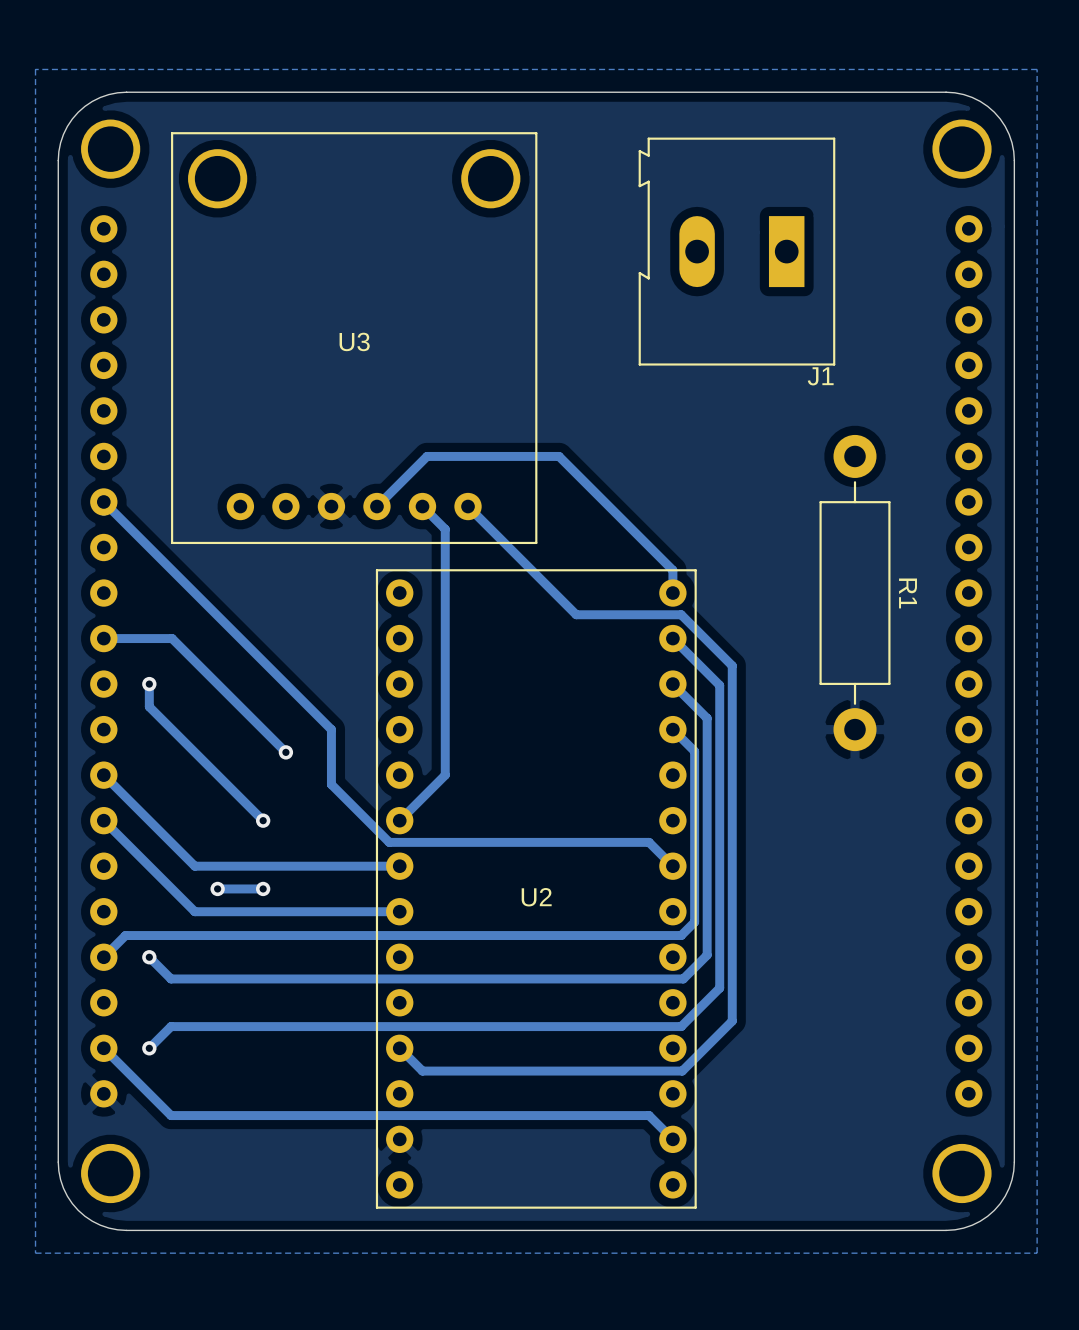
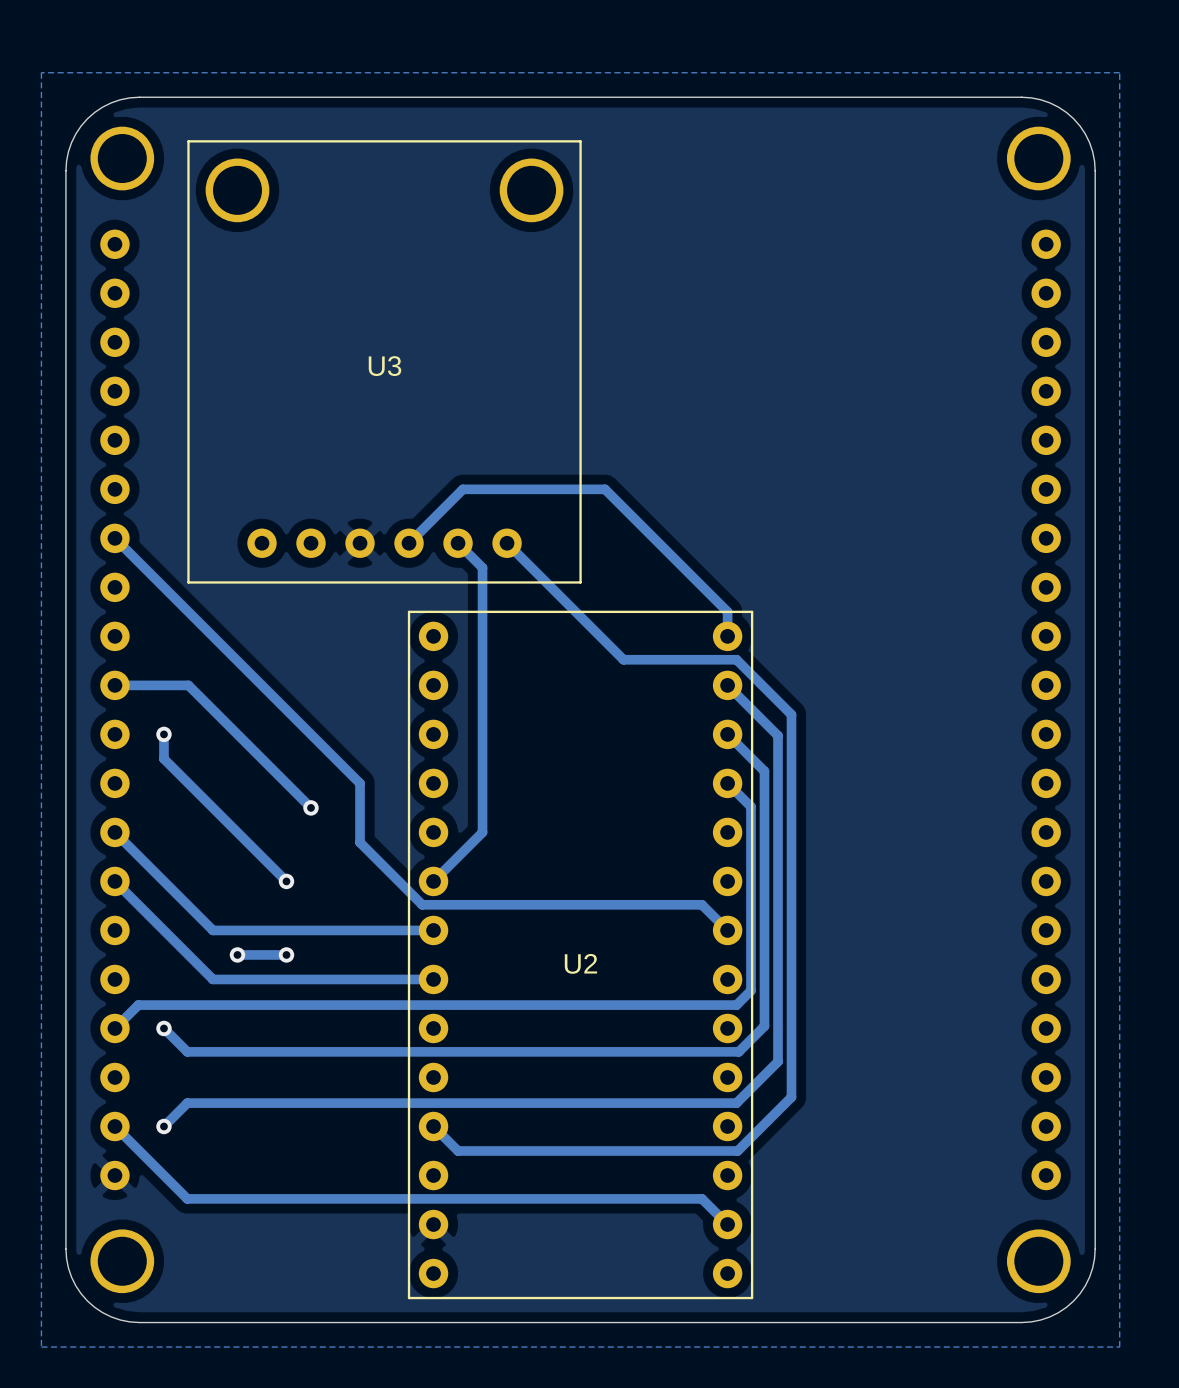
J1: (736, 251) -> none
R1: (855, 593) -> none

